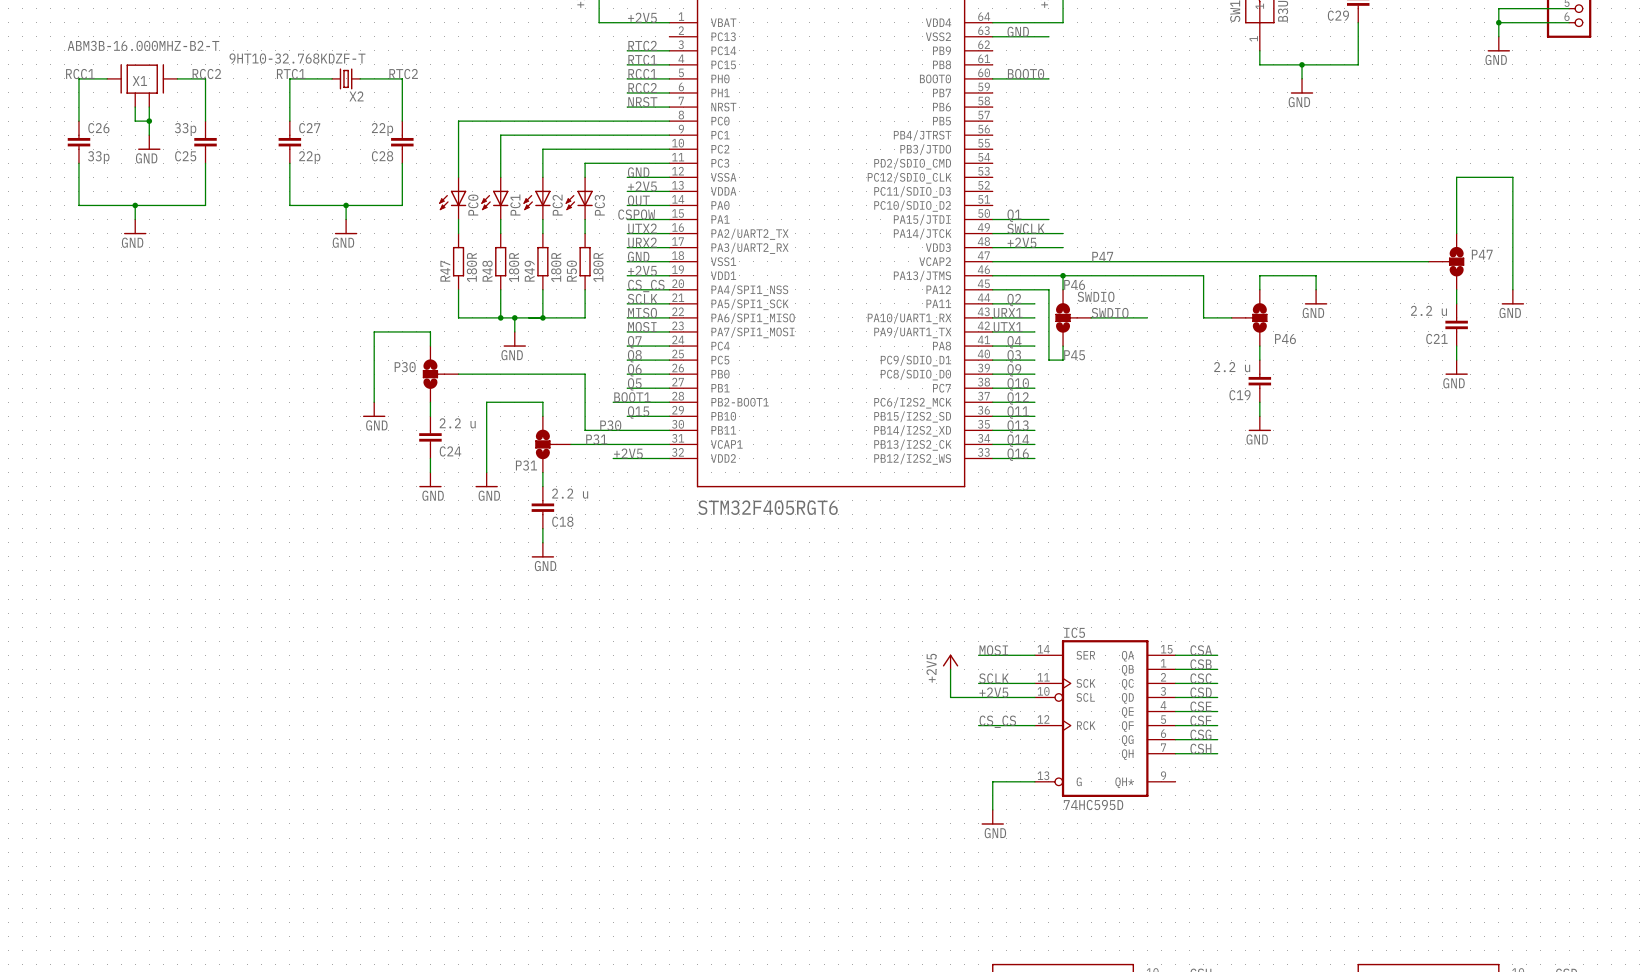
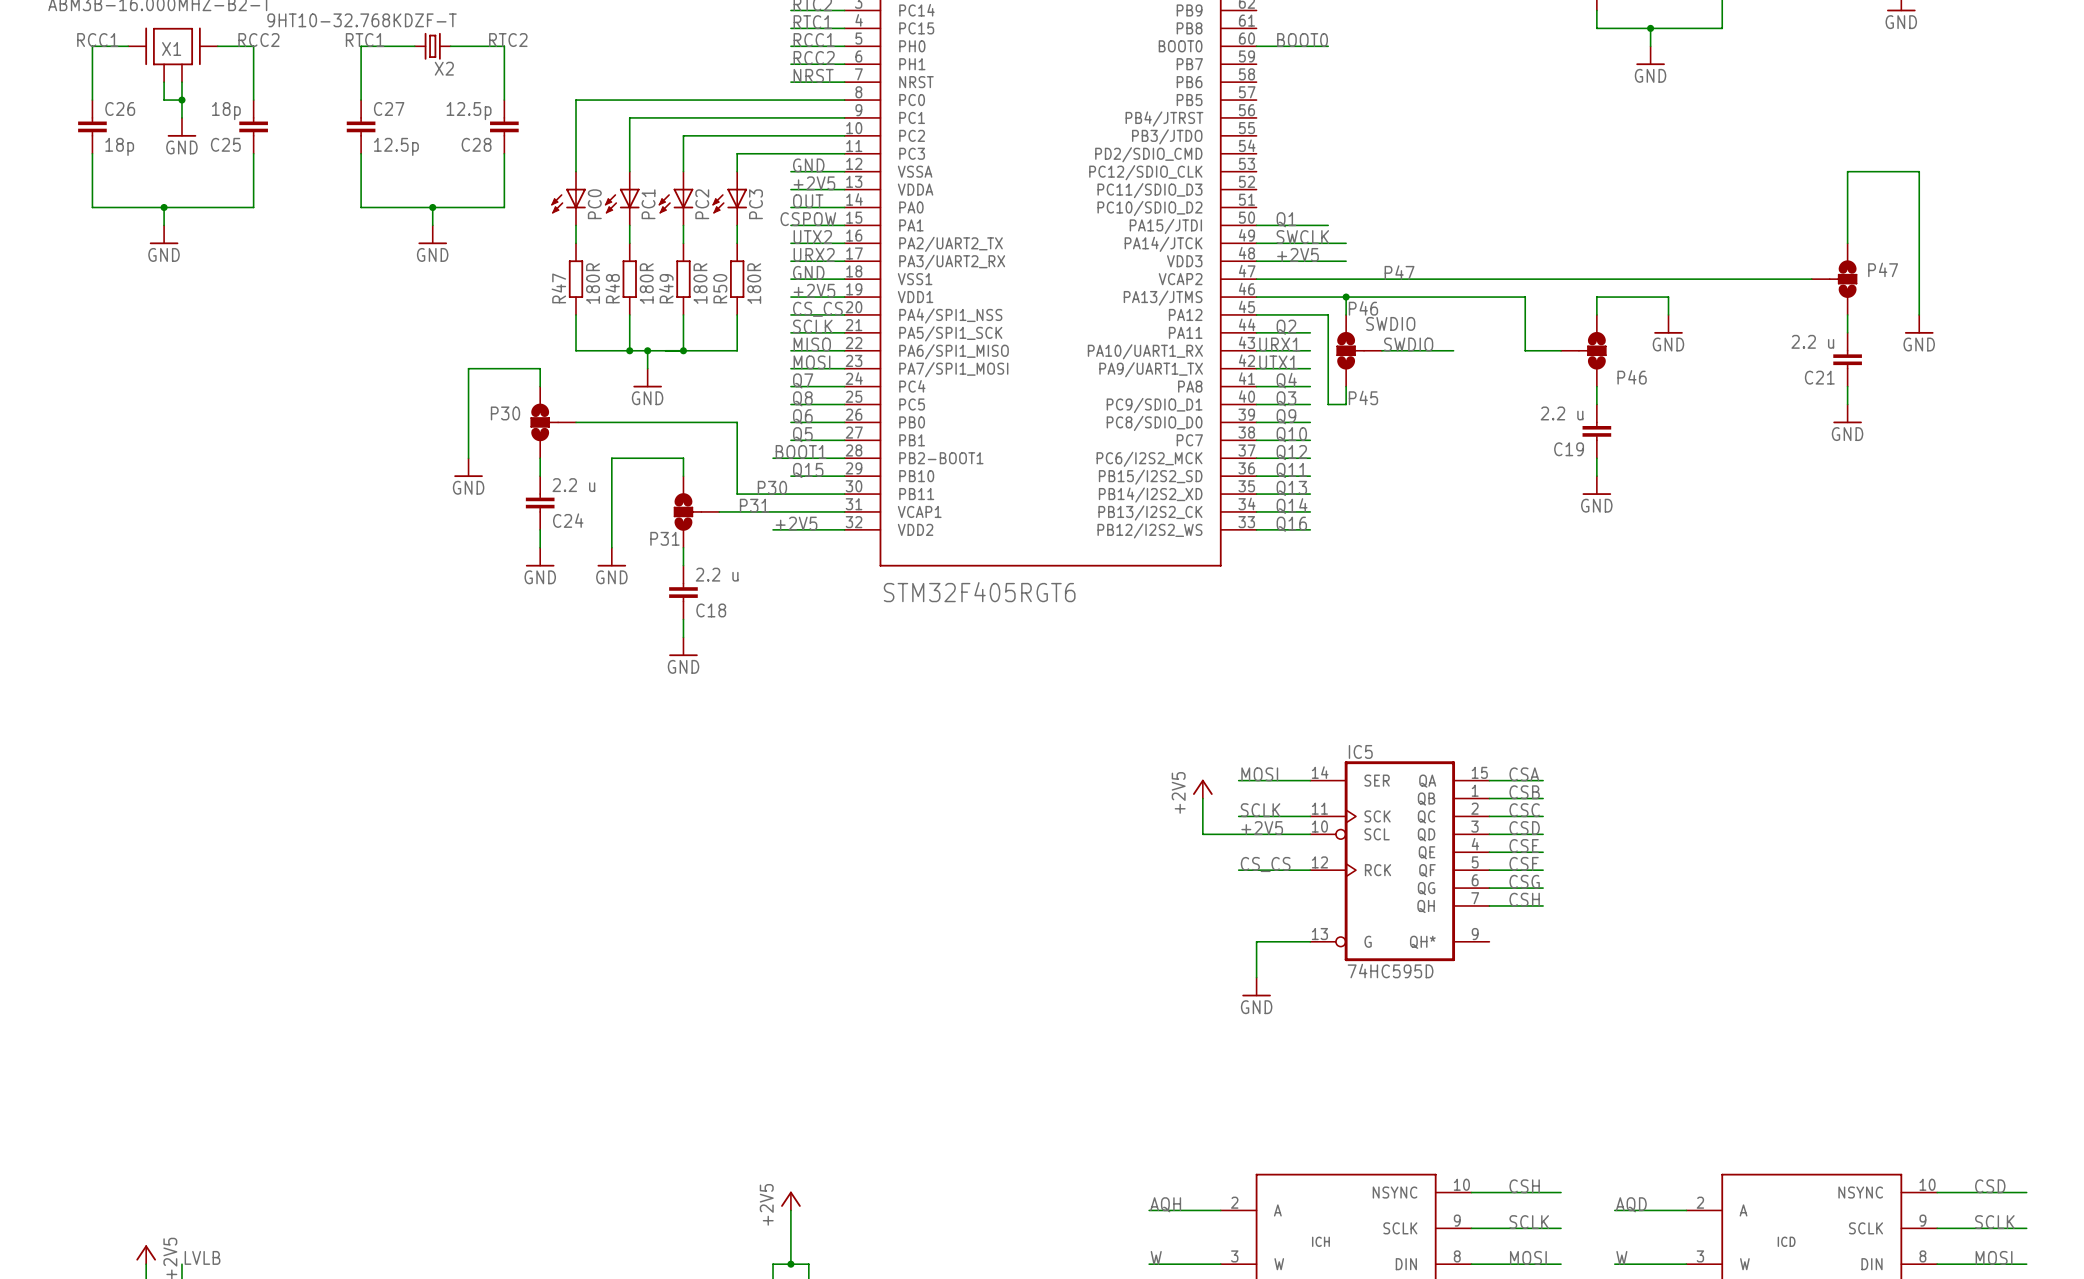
C25 value: 33p (185, 129) -> 18p (226, 111)
C28 value: 22p (382, 129) -> 12.5p (469, 111)
C26 value: 33p (98, 157) -> 18p (119, 146)
C27 value: 22p (309, 157) -> 12.5p (396, 146)

